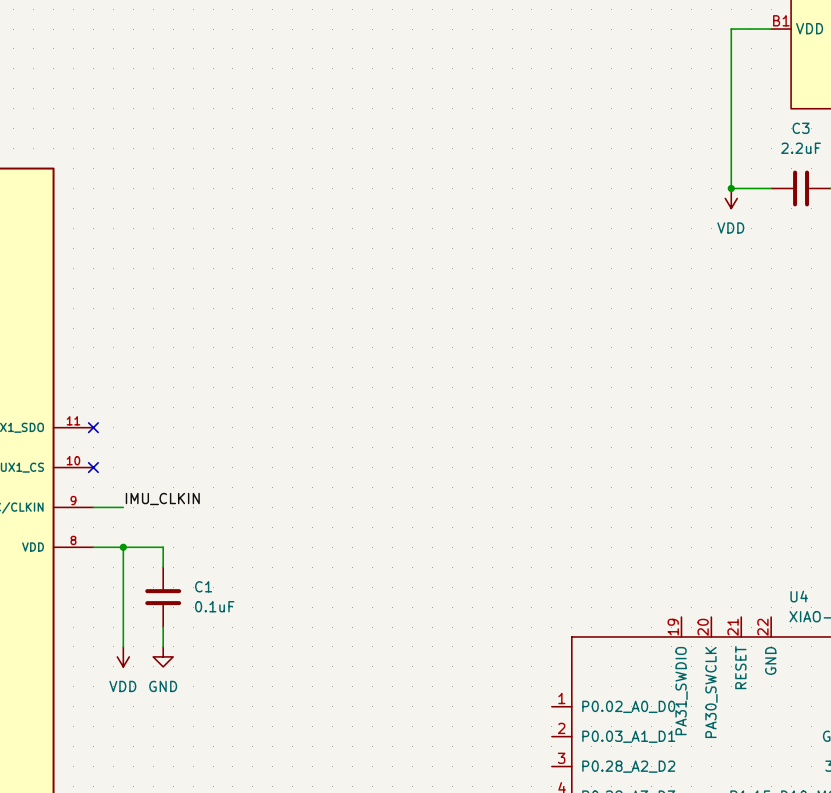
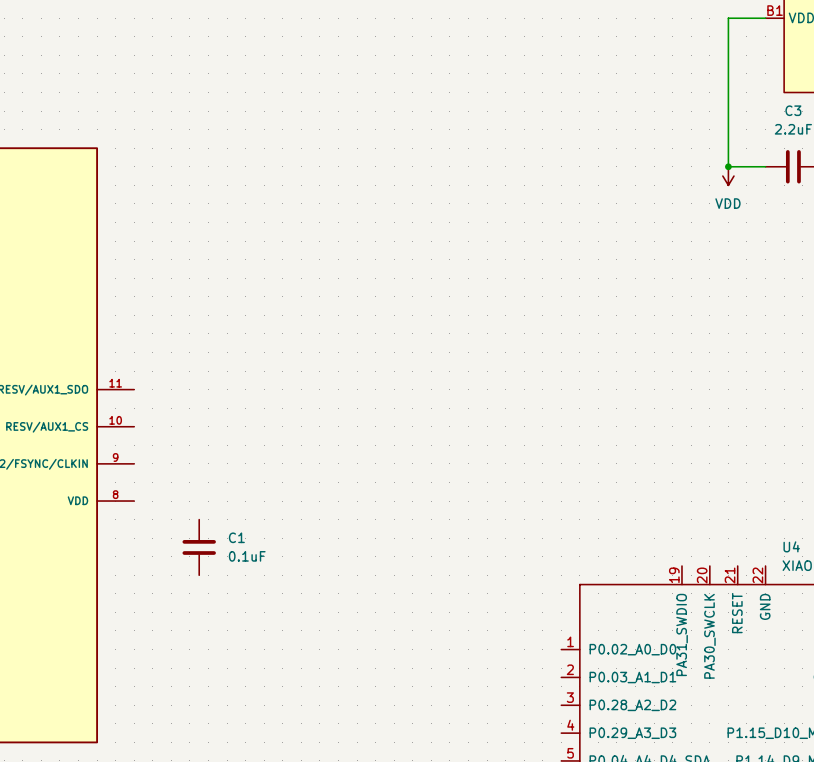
no-connect mark: (93, 427) -> none
no-connect mark: (93, 467) -> none
label: IMU_CLKIN (162, 499) -> none
wire: (93, 507) (123, 507) -> none
wire: (93, 547) (163, 547) (163, 567) -> none
wire: (123, 547) (123, 646) -> none
junction: (123, 547) -> none
wire: (163, 627) (163, 646) -> none
power symbol: VDD (123, 656) -> none
power symbol: GND (163, 656) -> none

